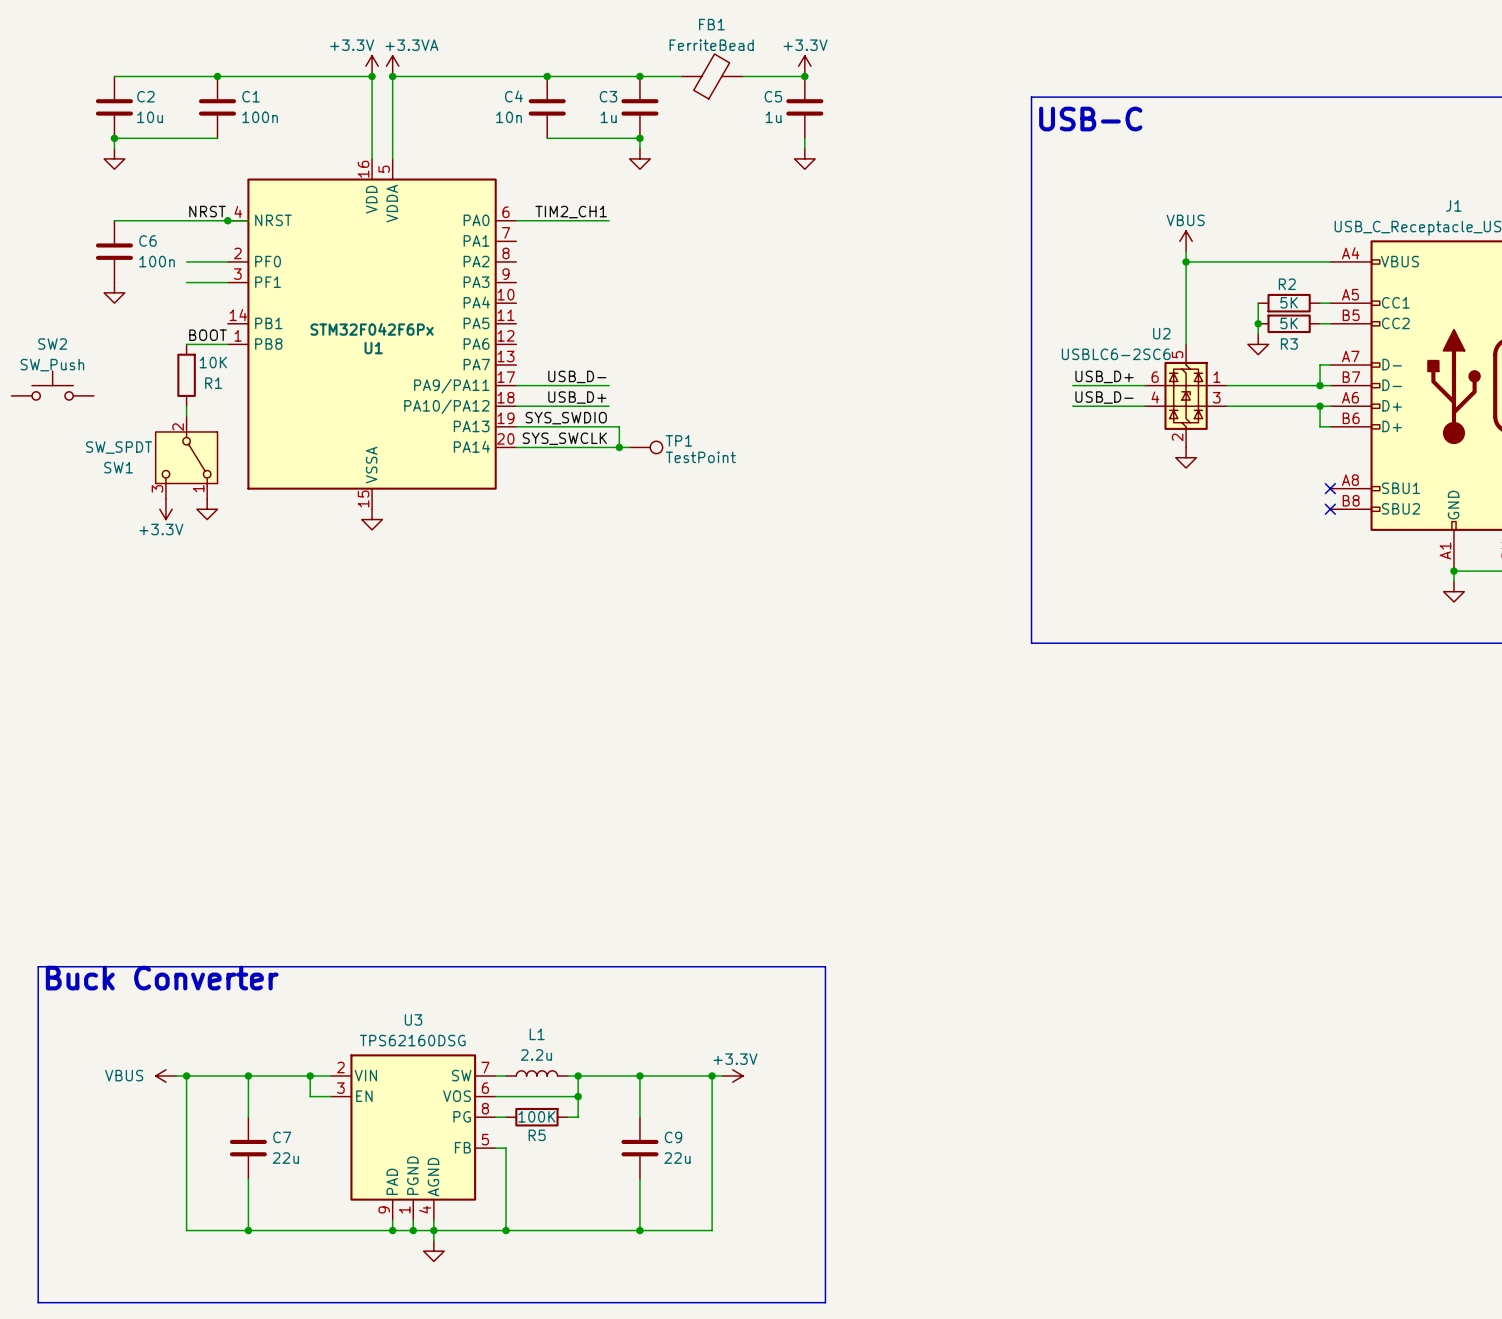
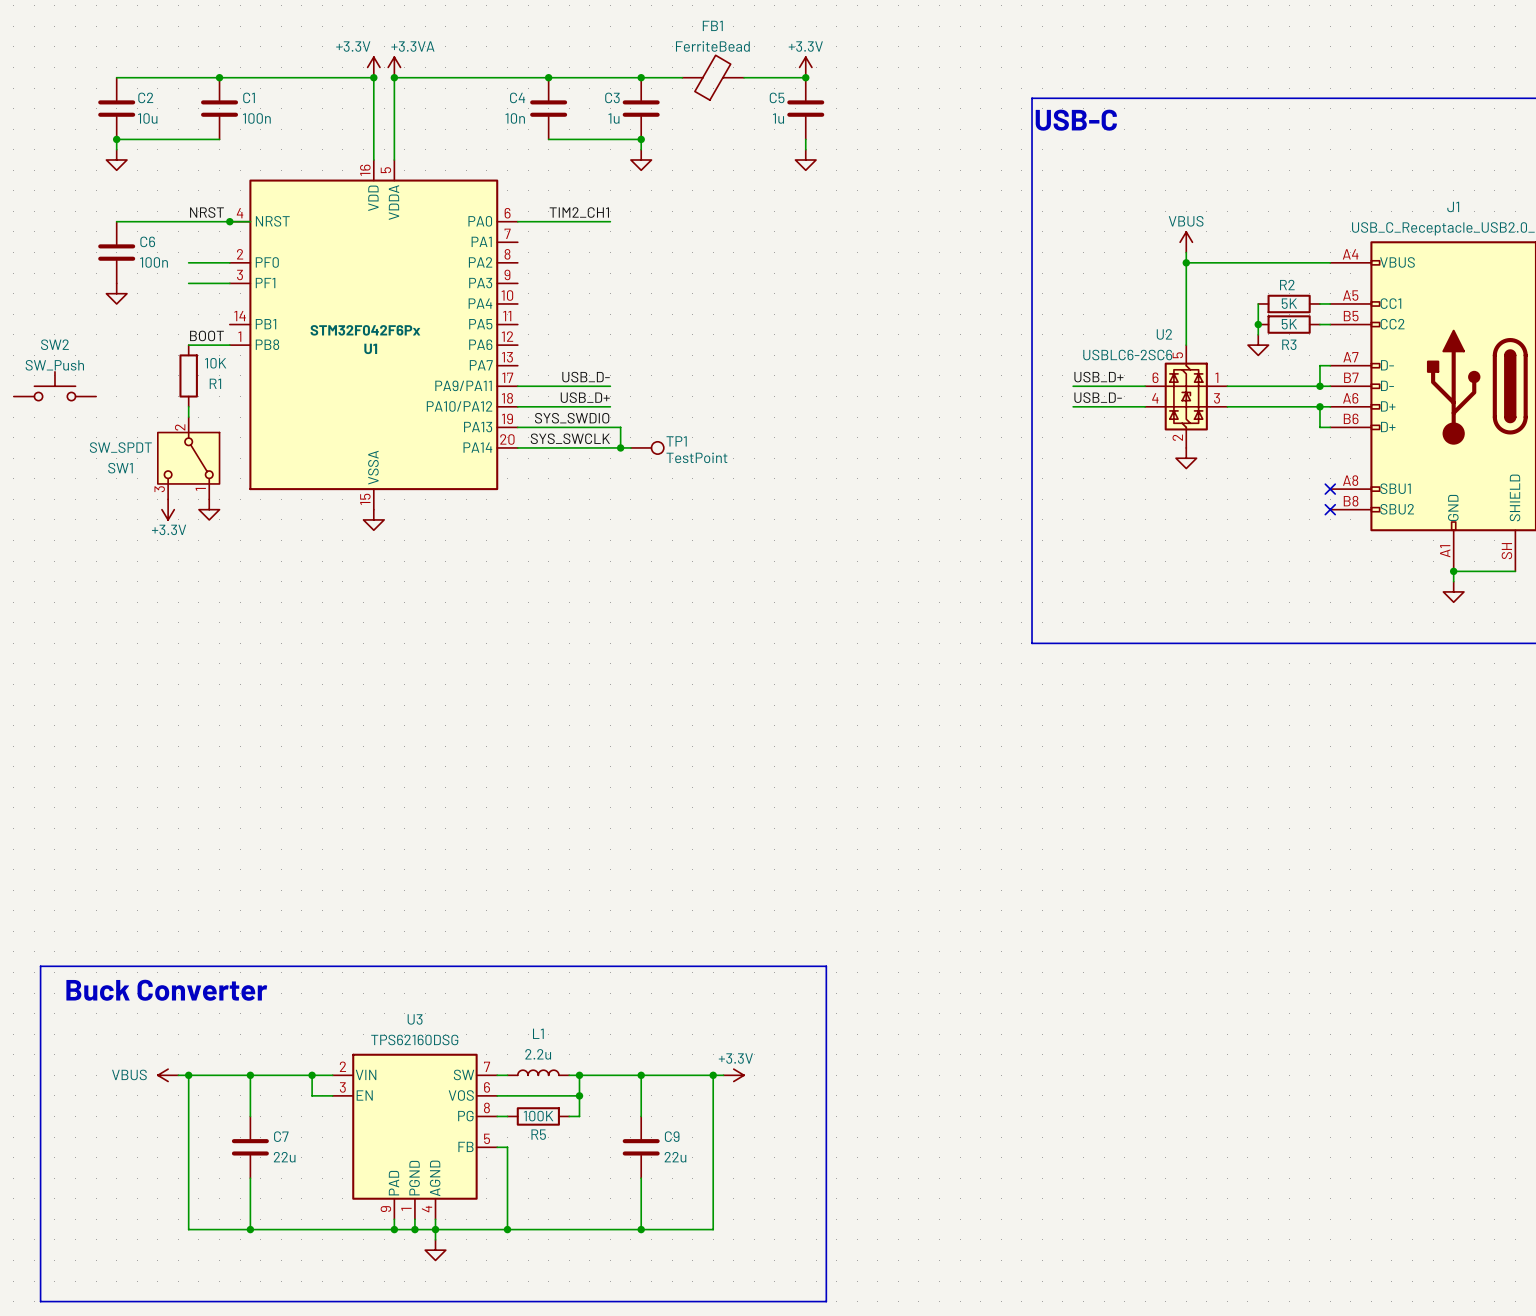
text position: Buck Converter (162, 978) -> Buck Converter (166, 990)

